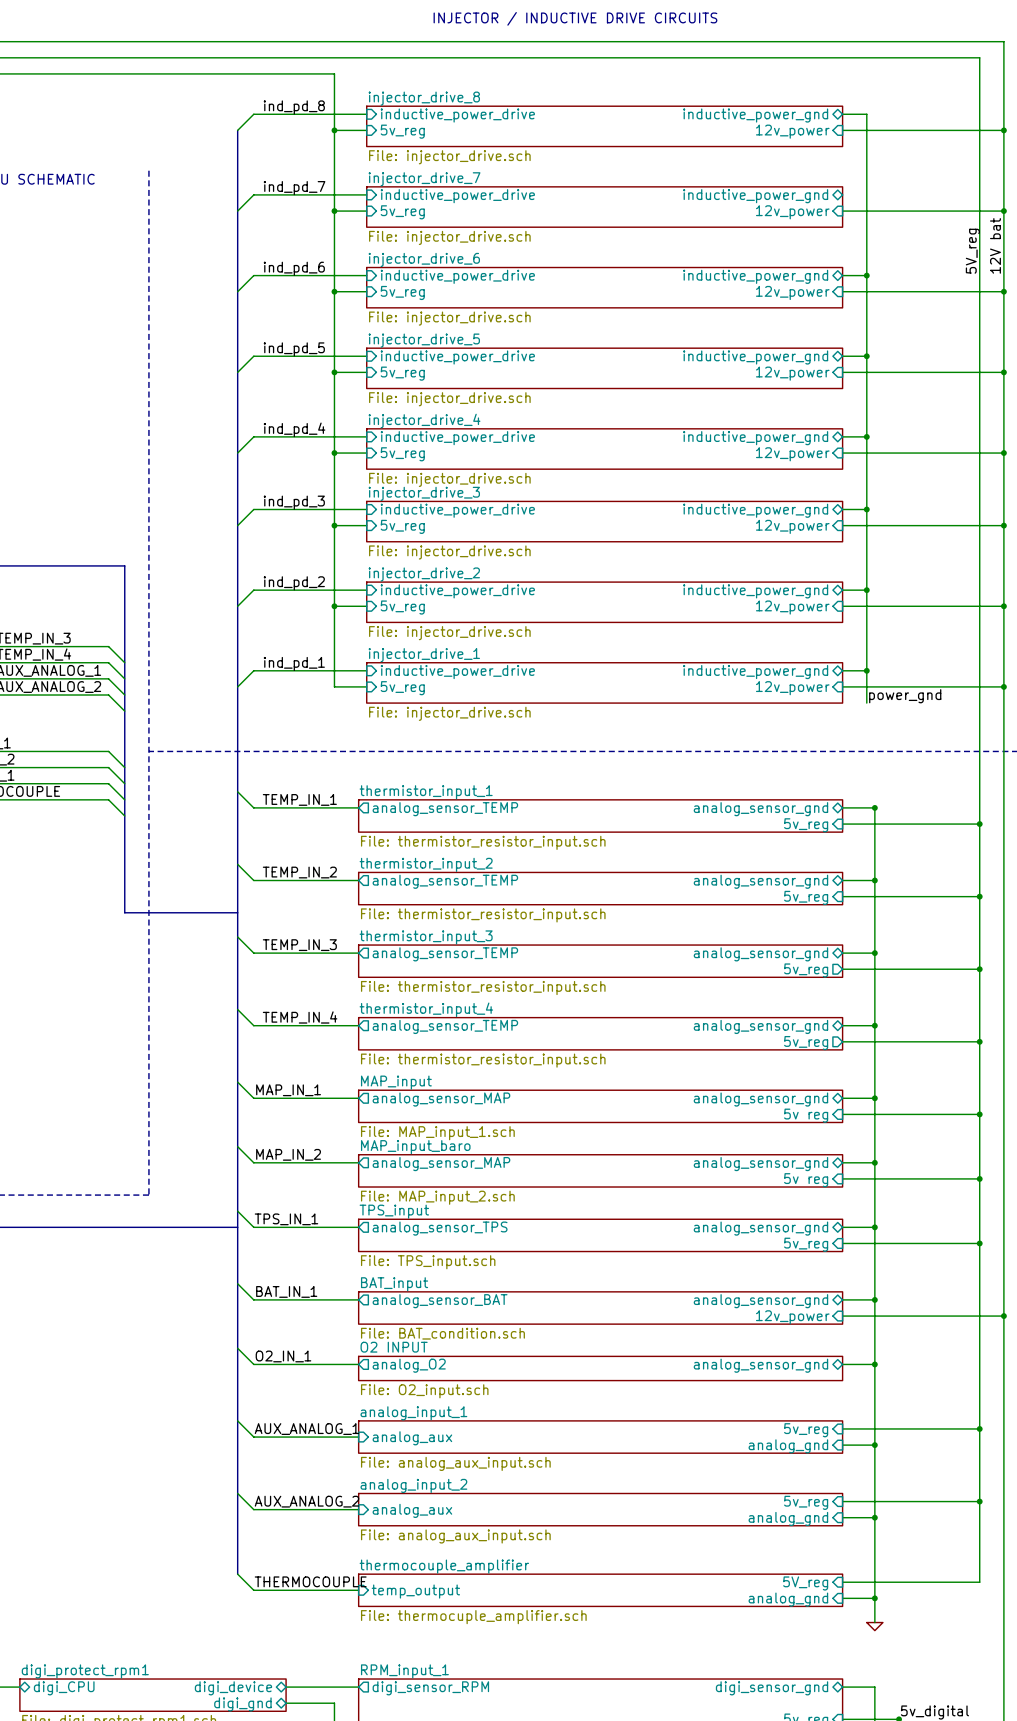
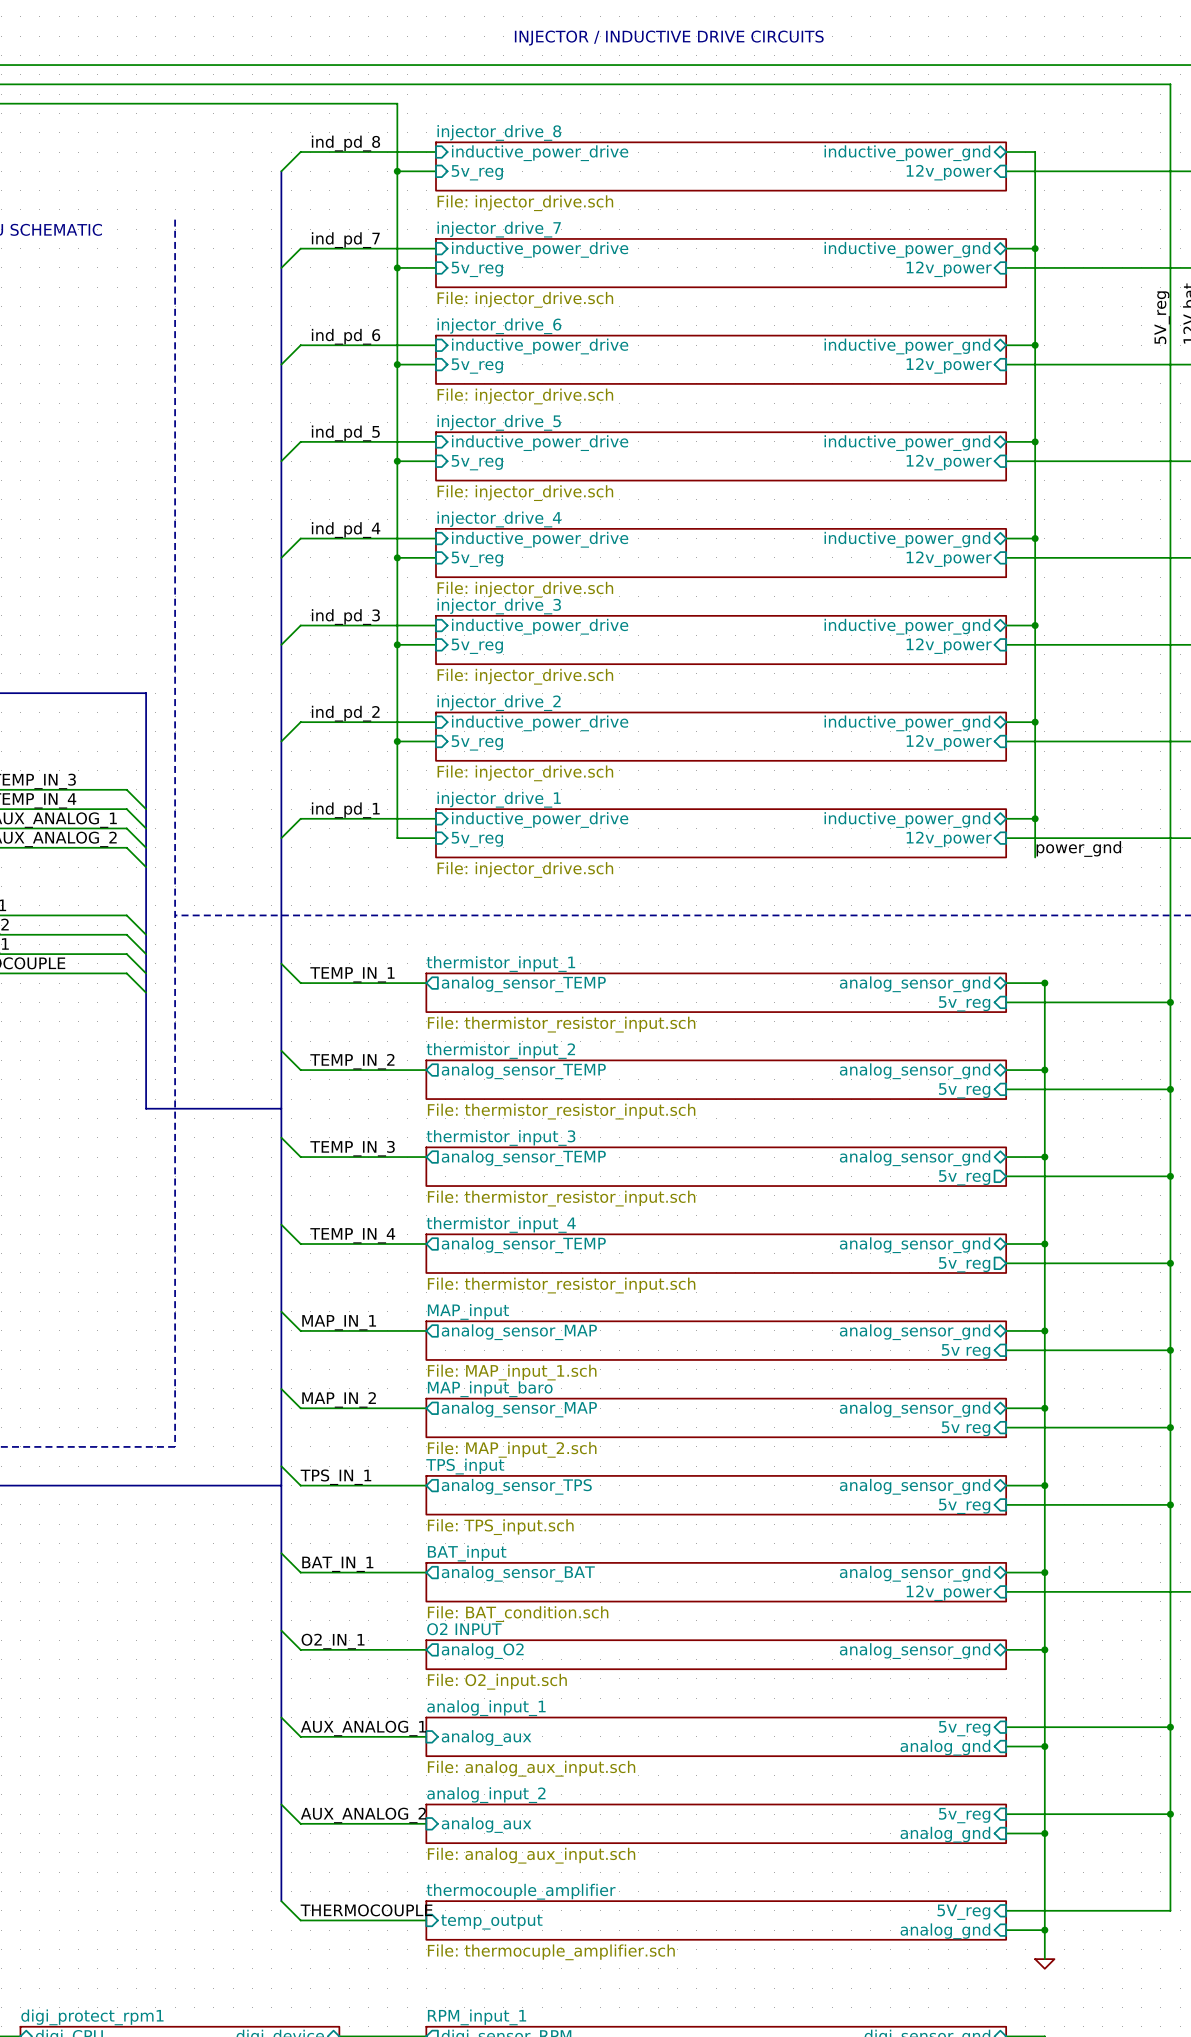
wire: none -> (1006, 248) (1035, 248)
junction: none -> (1035, 248)

